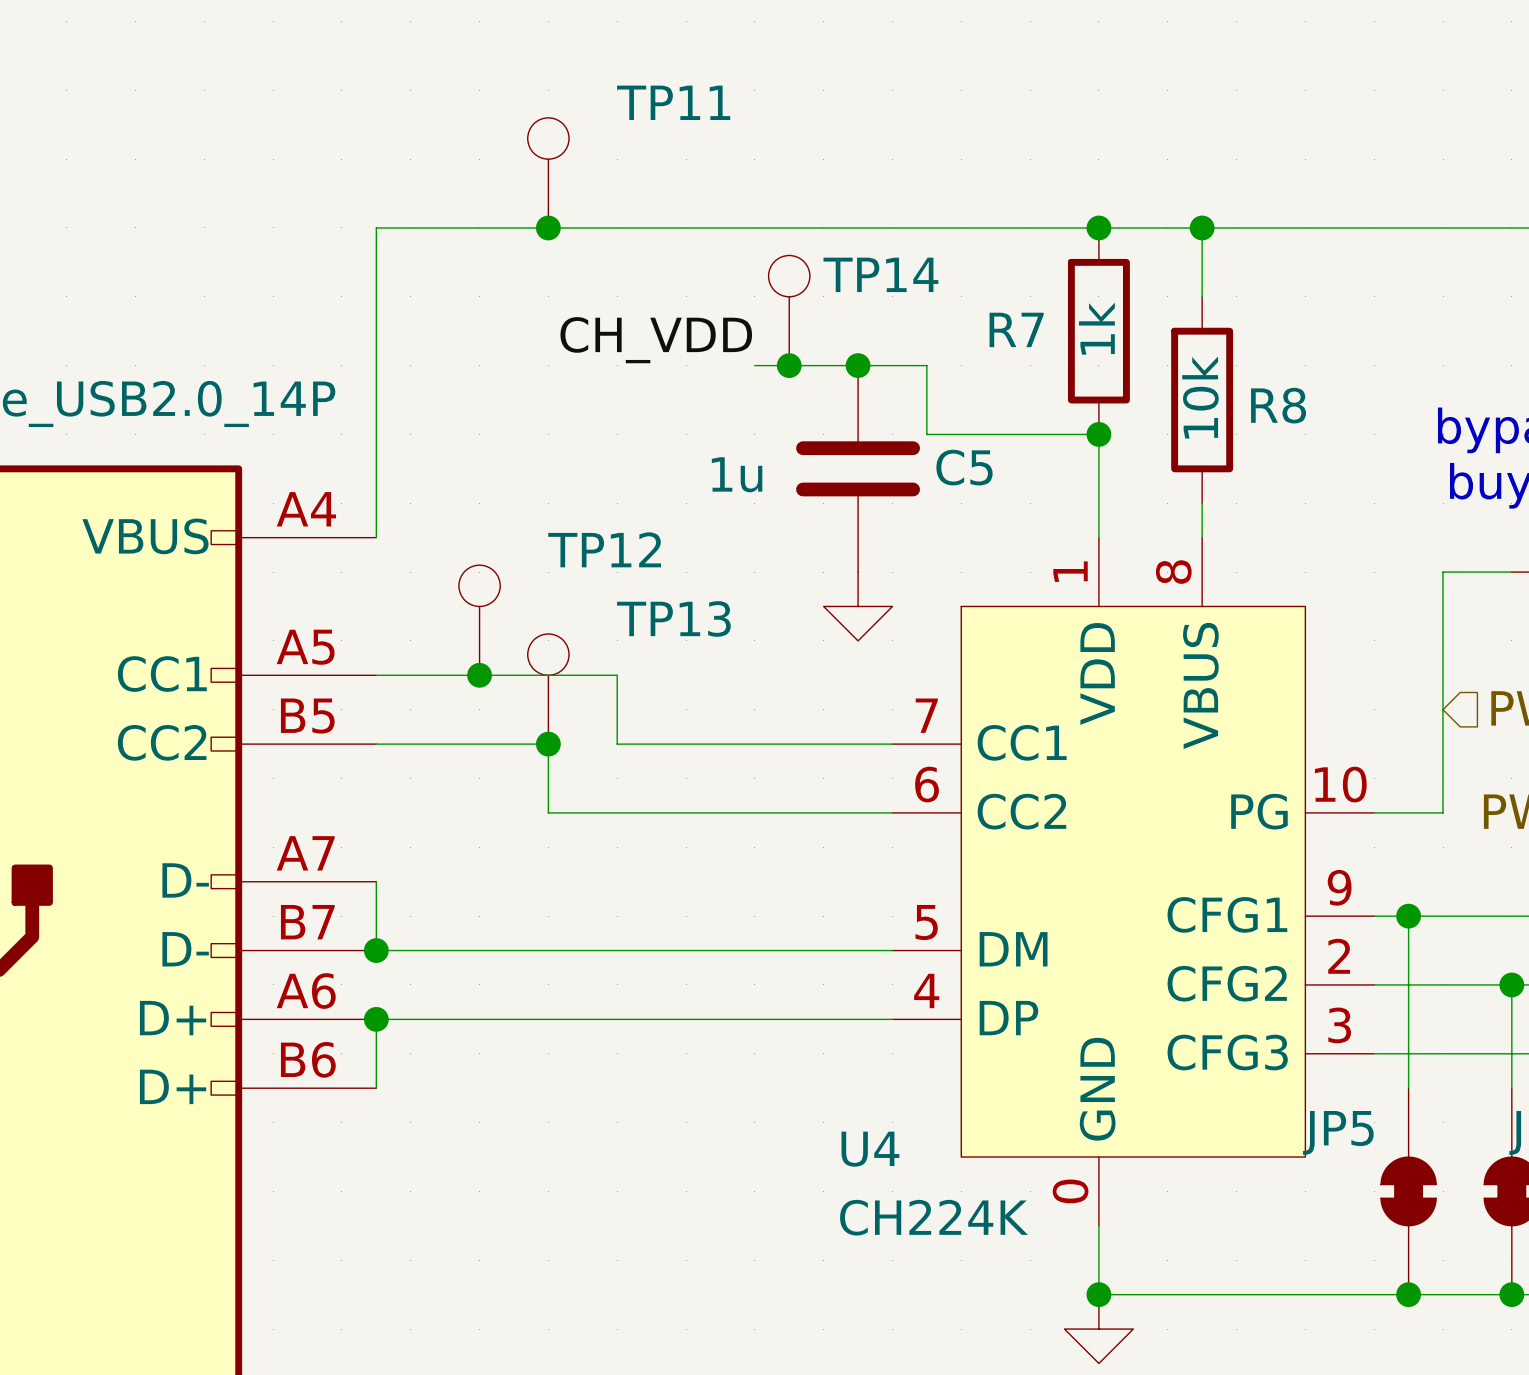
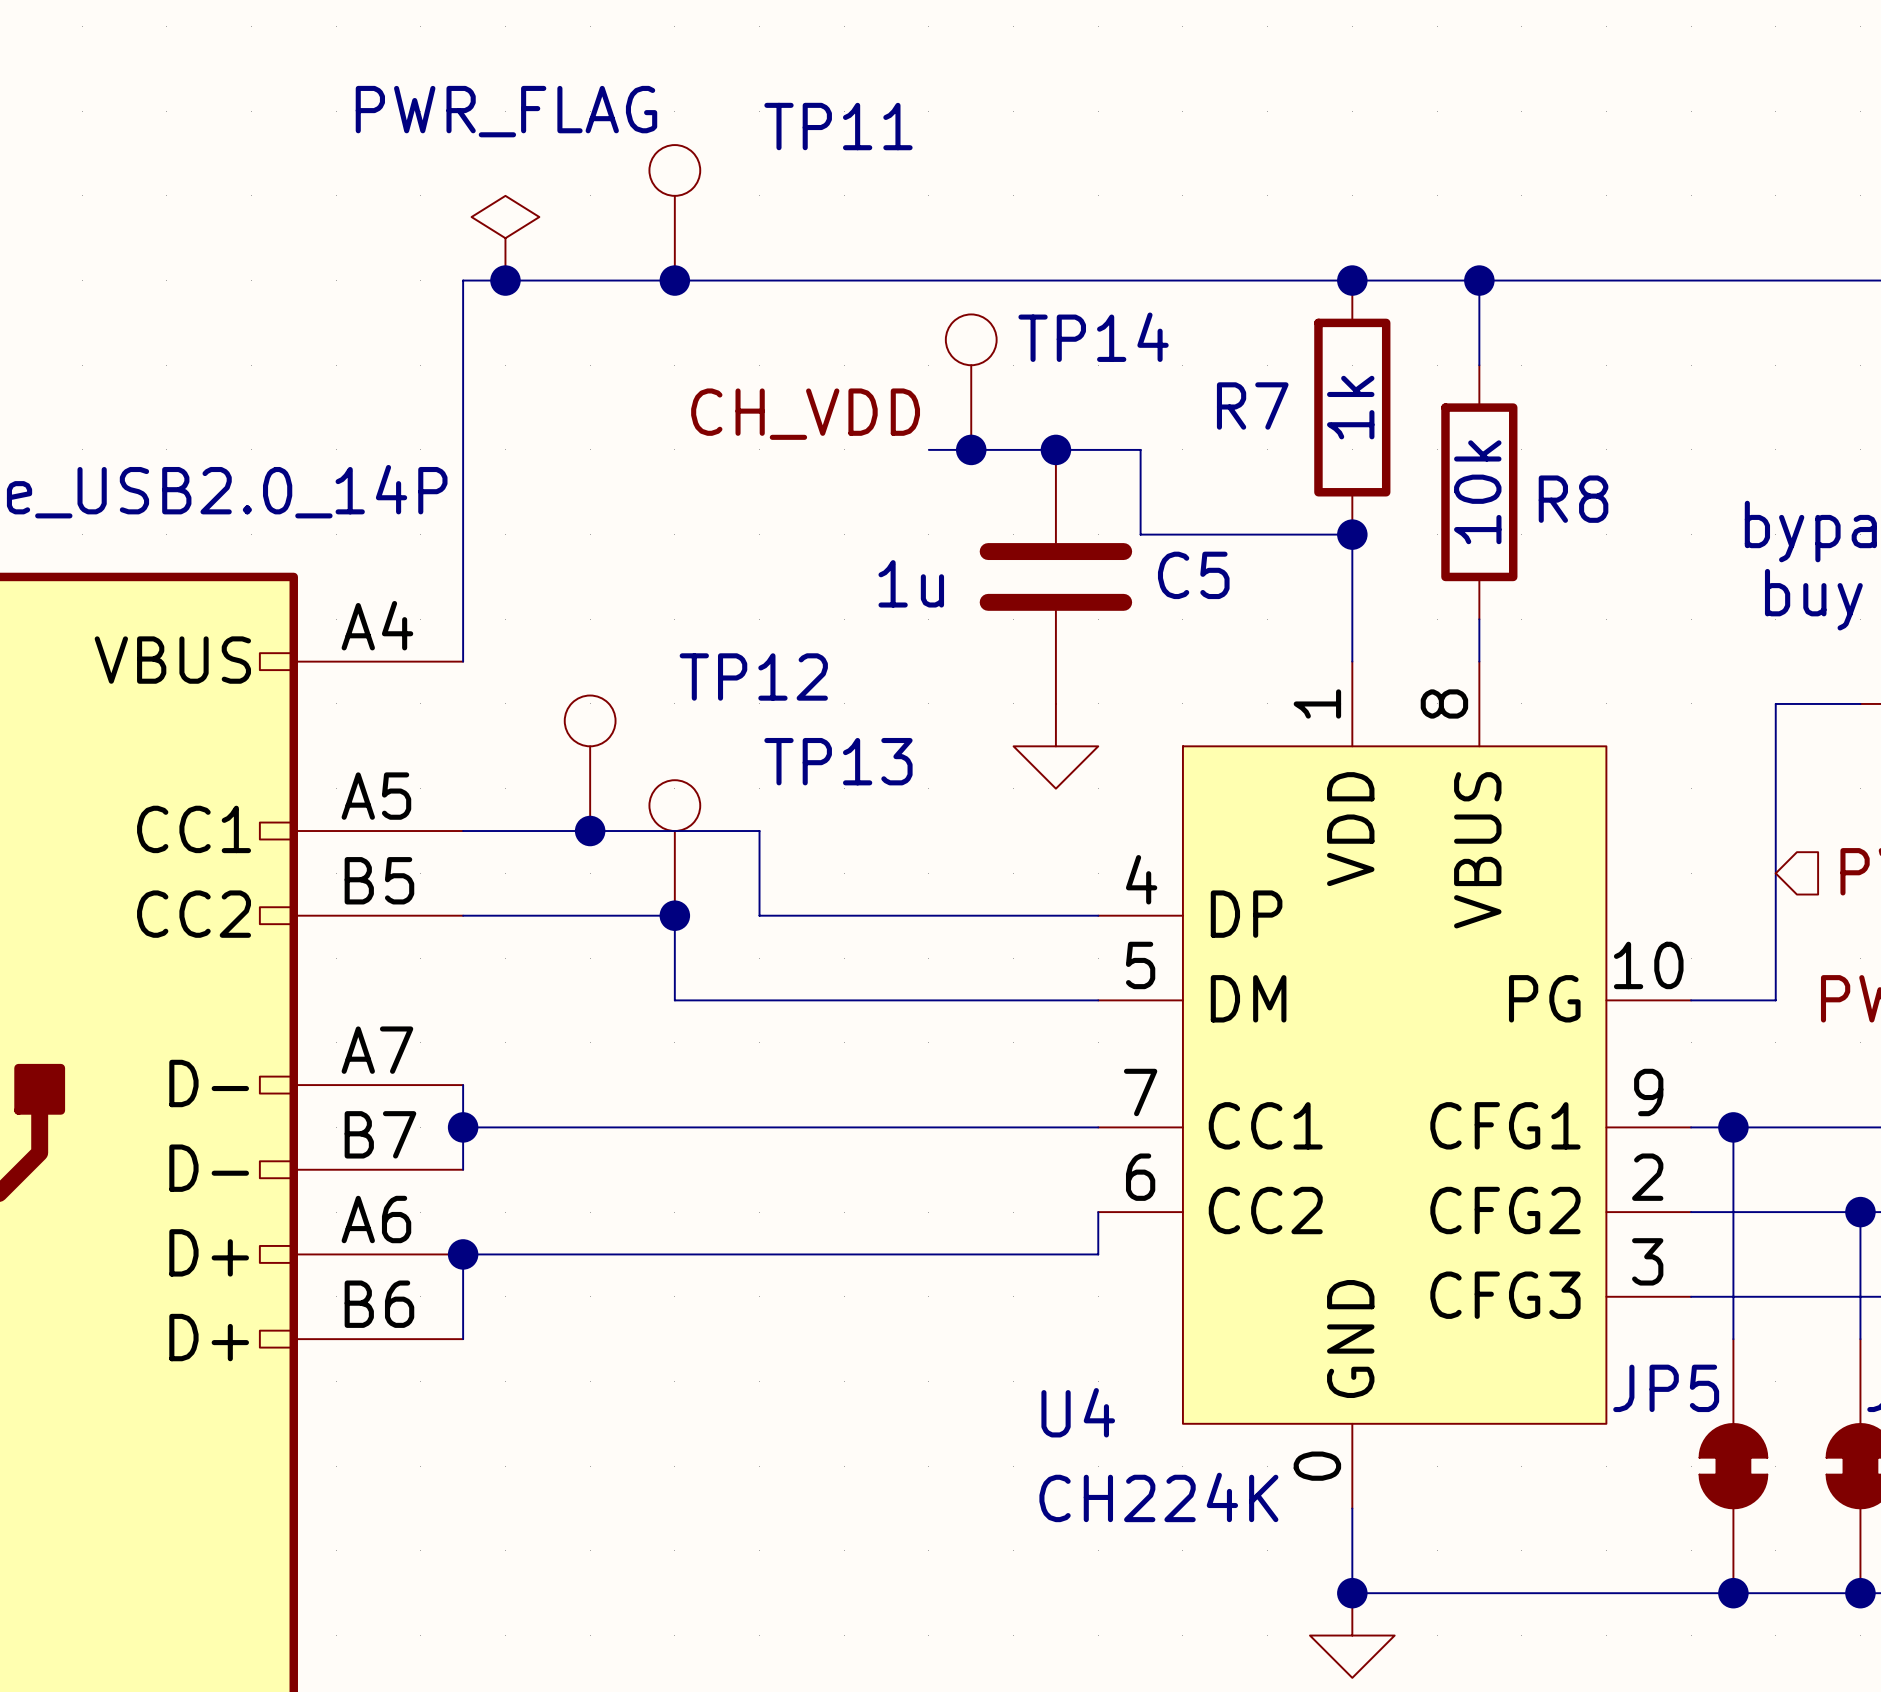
power symbol: none -> PWR_FLAG (505, 238)
junction: none -> (505, 280)
U4 symbol: [892, 537, 1375, 1226] -> [1098, 661, 1692, 1509]
wire: (376, 950) (892, 950) -> (463, 1127) (1098, 1127)
junction position: (376, 950) -> (463, 1127)
wire: none -> (1098, 1212) (1098, 1254)

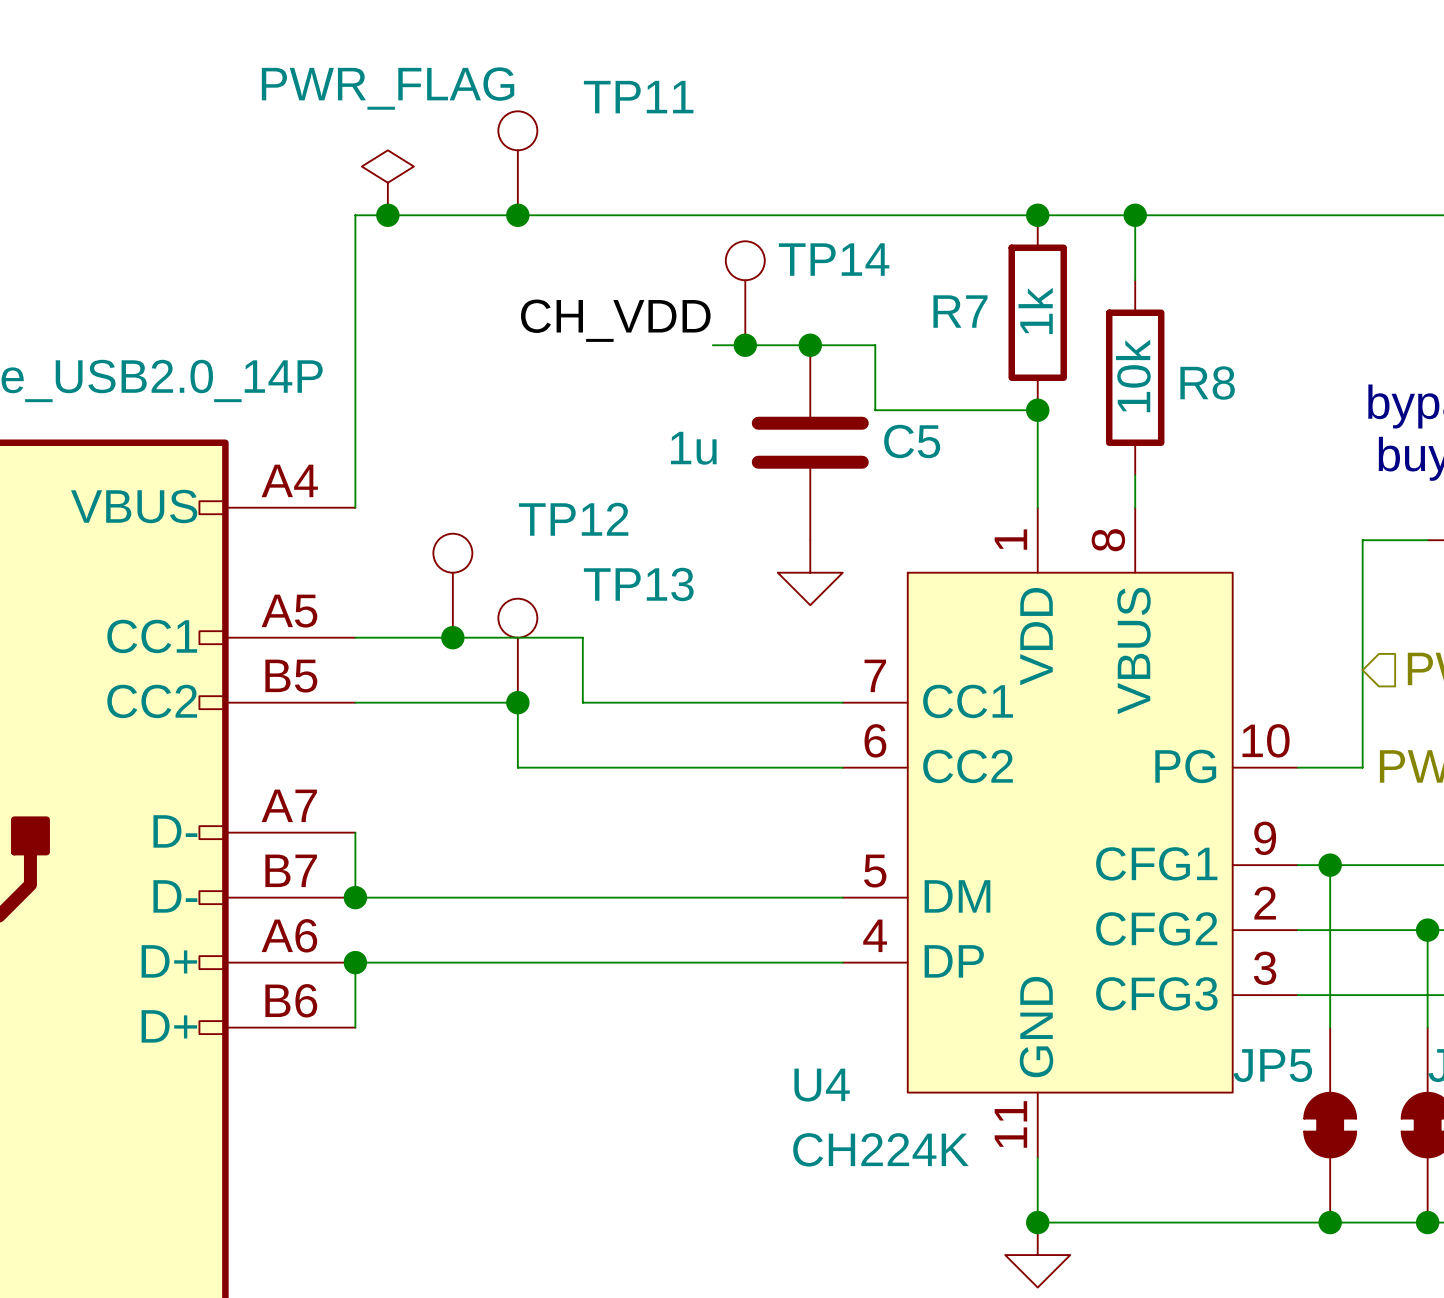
U4 symbol: [1098, 661, 1692, 1509] -> [842, 507, 1298, 1158]
wire: (463, 1127) (1098, 1127) -> (355, 897) (842, 897)
junction position: (463, 1127) -> (355, 897)
wire: (1098, 1212) (1098, 1254) -> none

